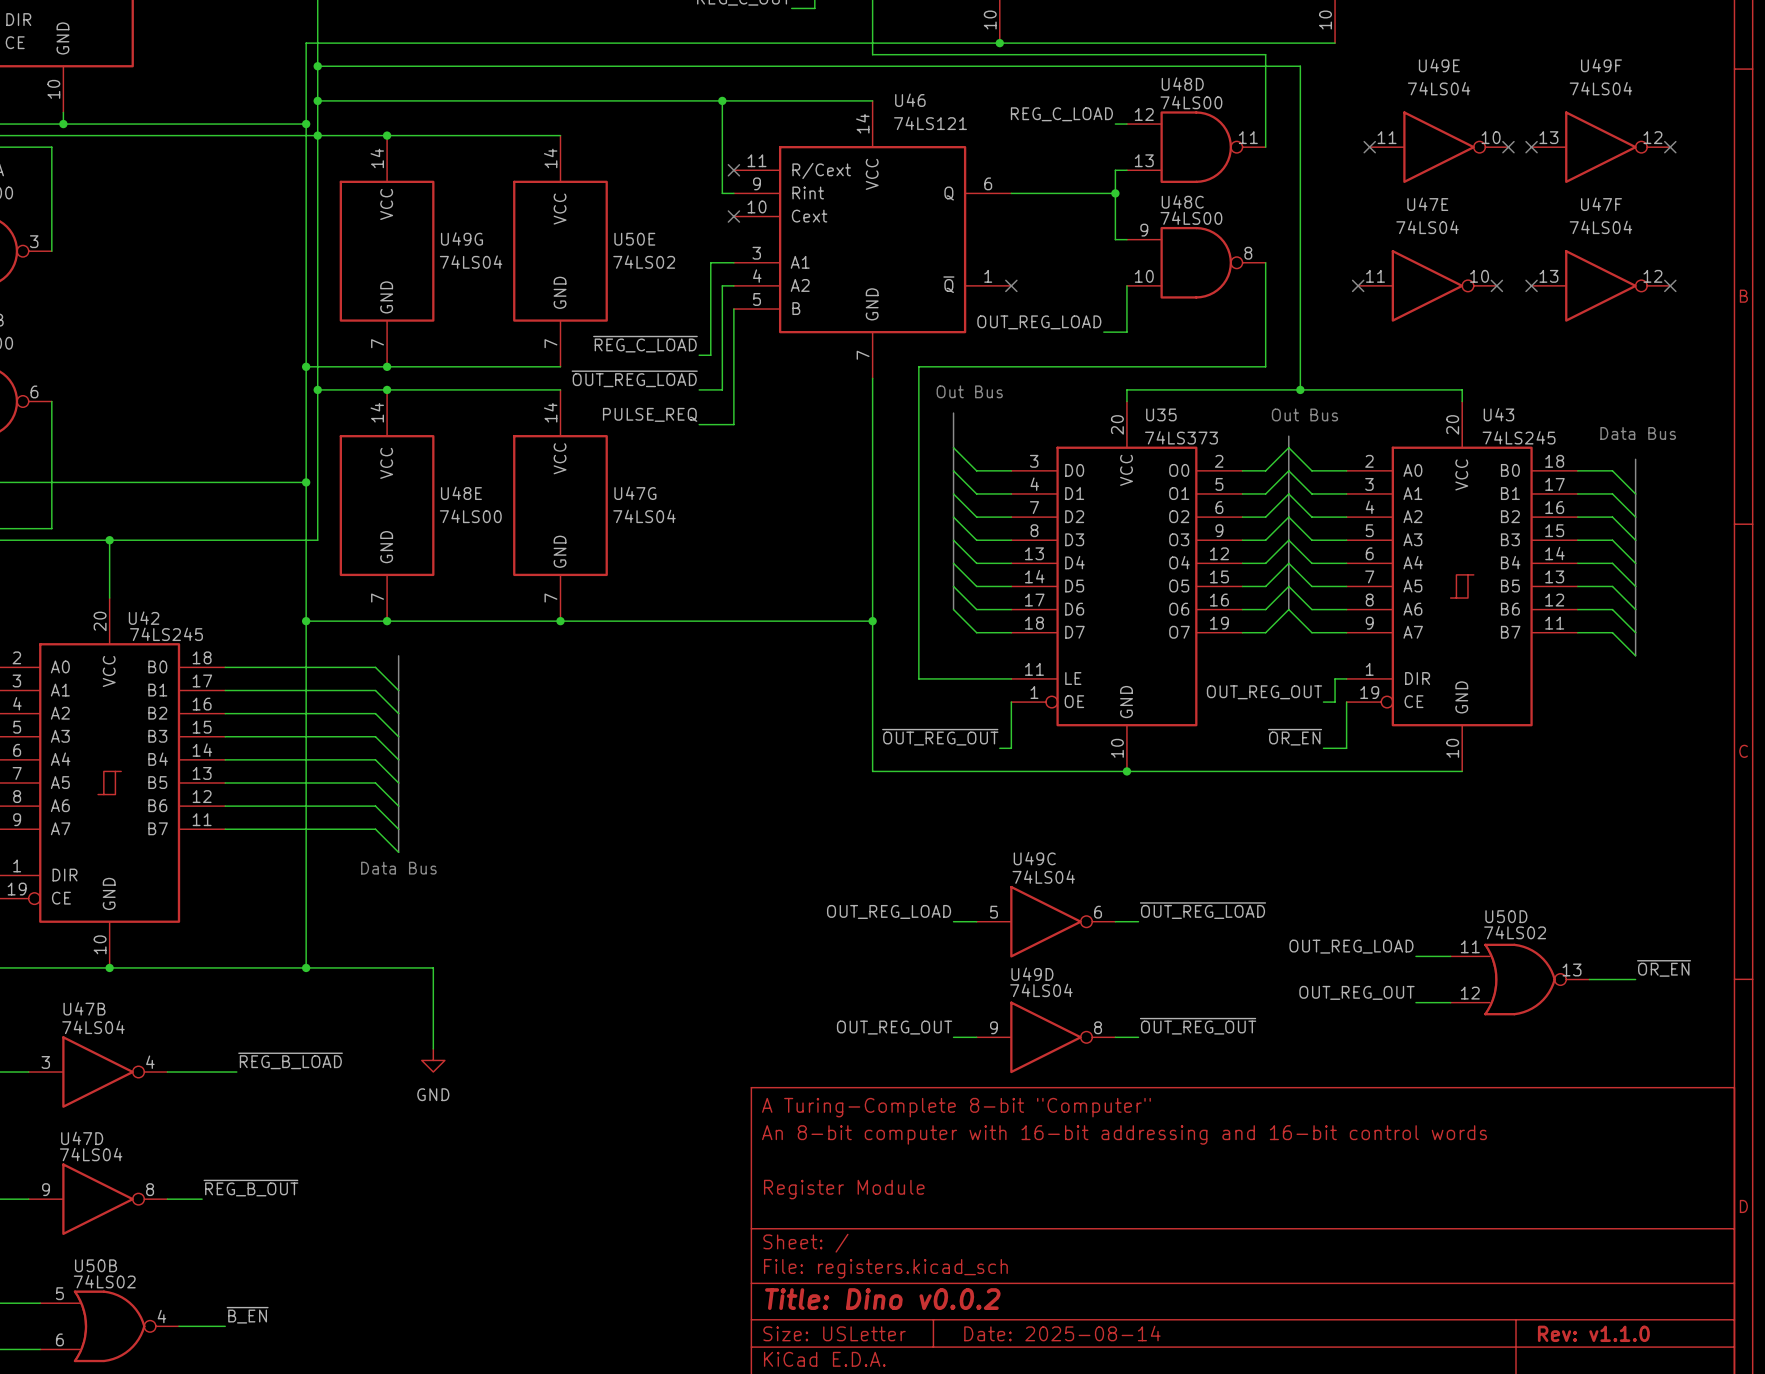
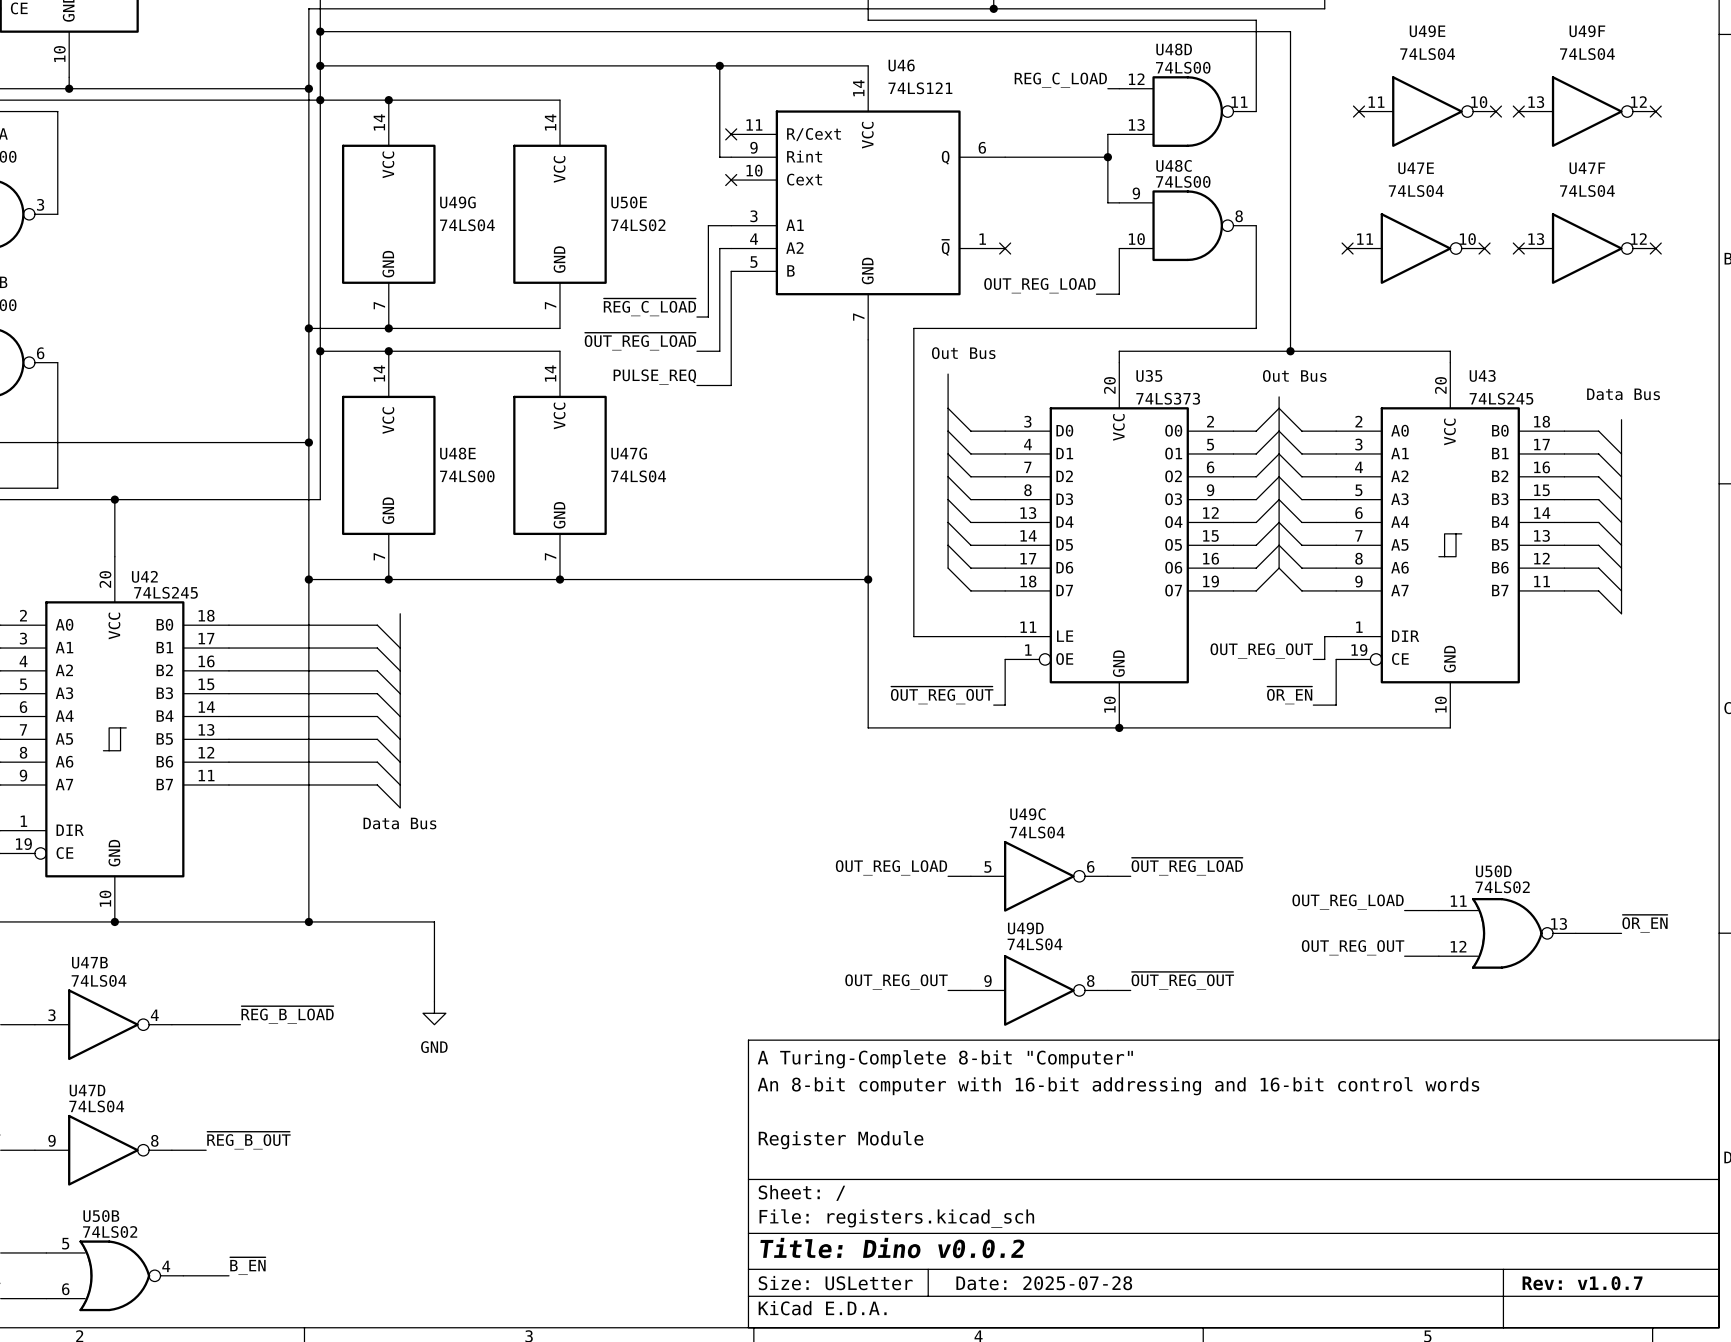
title block: Date: 2025-08-14 (1062, 1333) -> Date: 2025-07-28 (1044, 1283)
title block: Rev: v1.1.0 (1593, 1333) -> Rev: v1.0.7 (1582, 1283)

